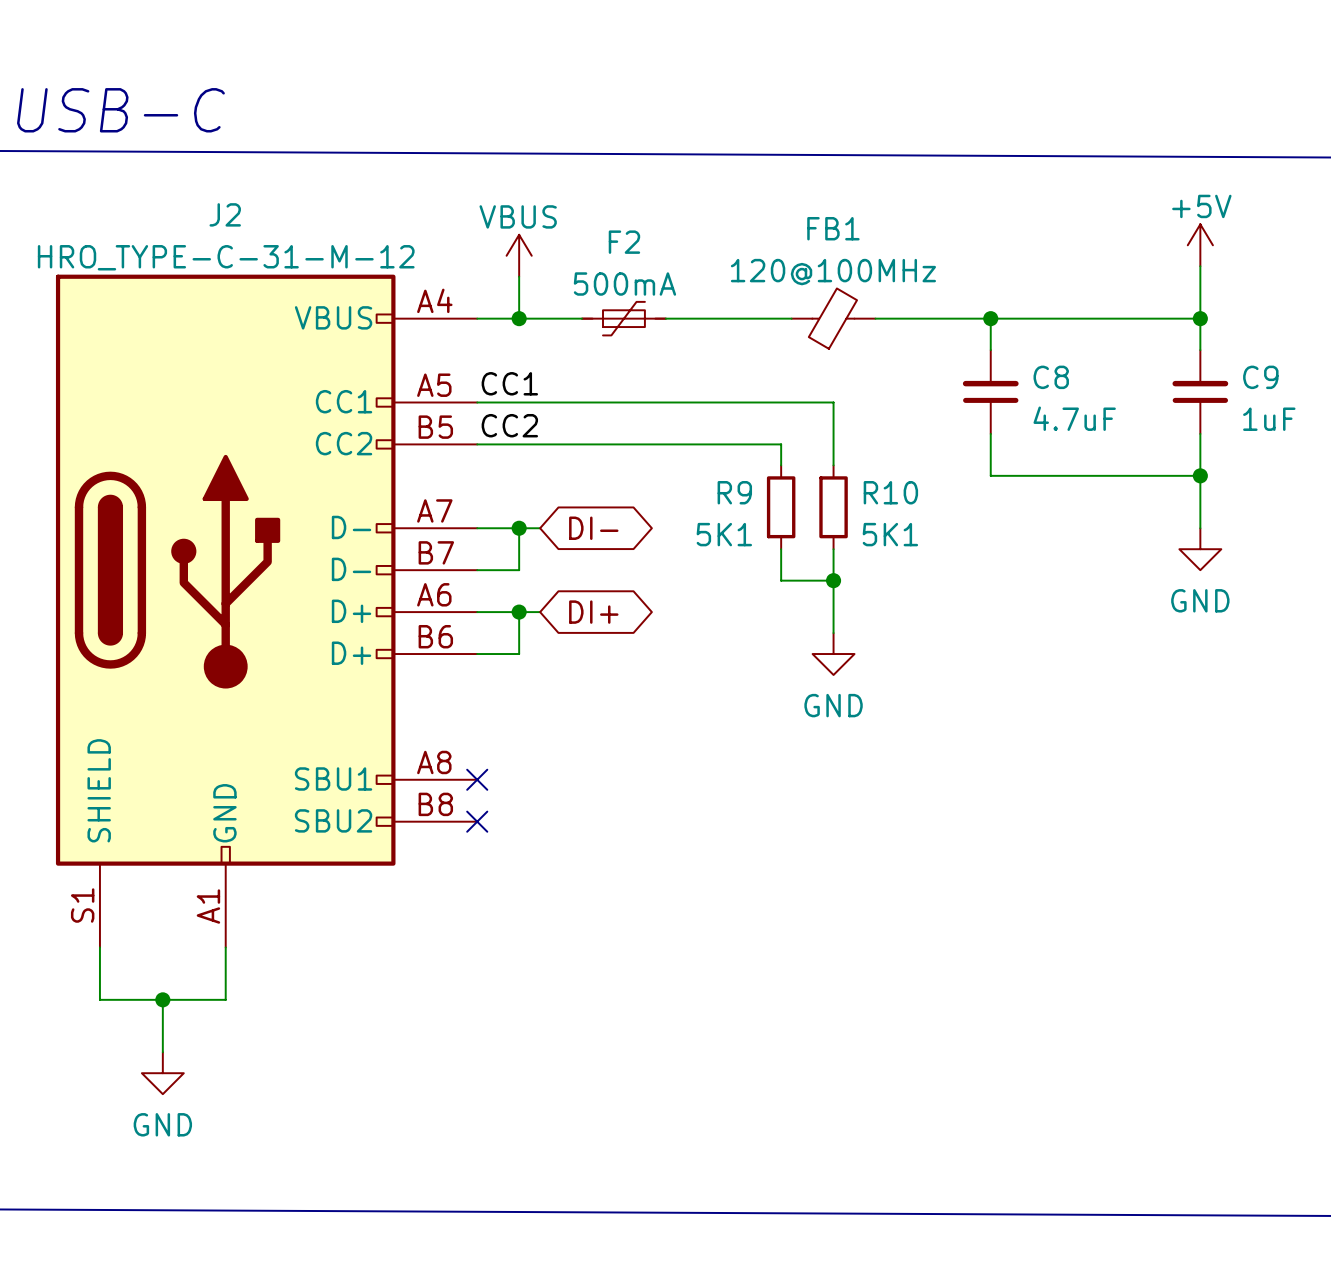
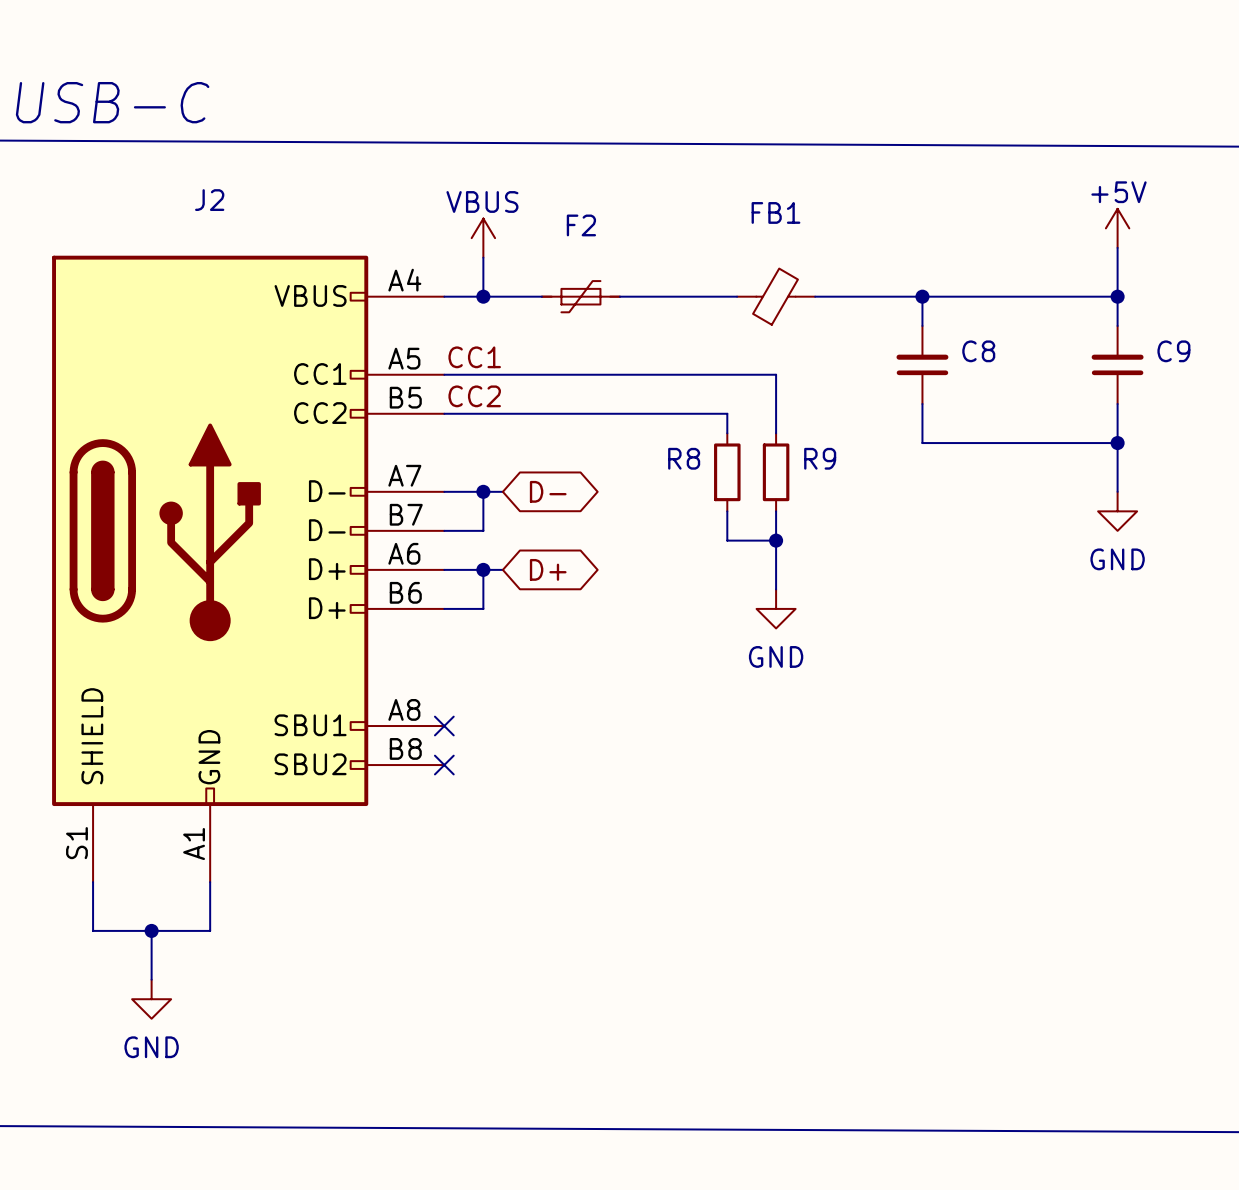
J2 value: HRO_TYPE-C-31-M-12 (226, 257) -> none
FB1 value: 120@100MHz (833, 272) -> none
F2 value: 500mA (624, 284) -> none
C8 value: 4.7uF (1074, 418) -> none
C9 value: 1uF (1269, 419) -> none
R9 name: R9 (734, 492) -> R8 (684, 458)
R10 name: R10 (890, 492) -> R9 (820, 458)
global label: DI- (593, 528) -> D- (548, 491)
R9 value: 5K1 (724, 534) -> none
R10 value: 5K1 (890, 534) -> none
global label: DI+ (593, 612) -> D+ (548, 569)

